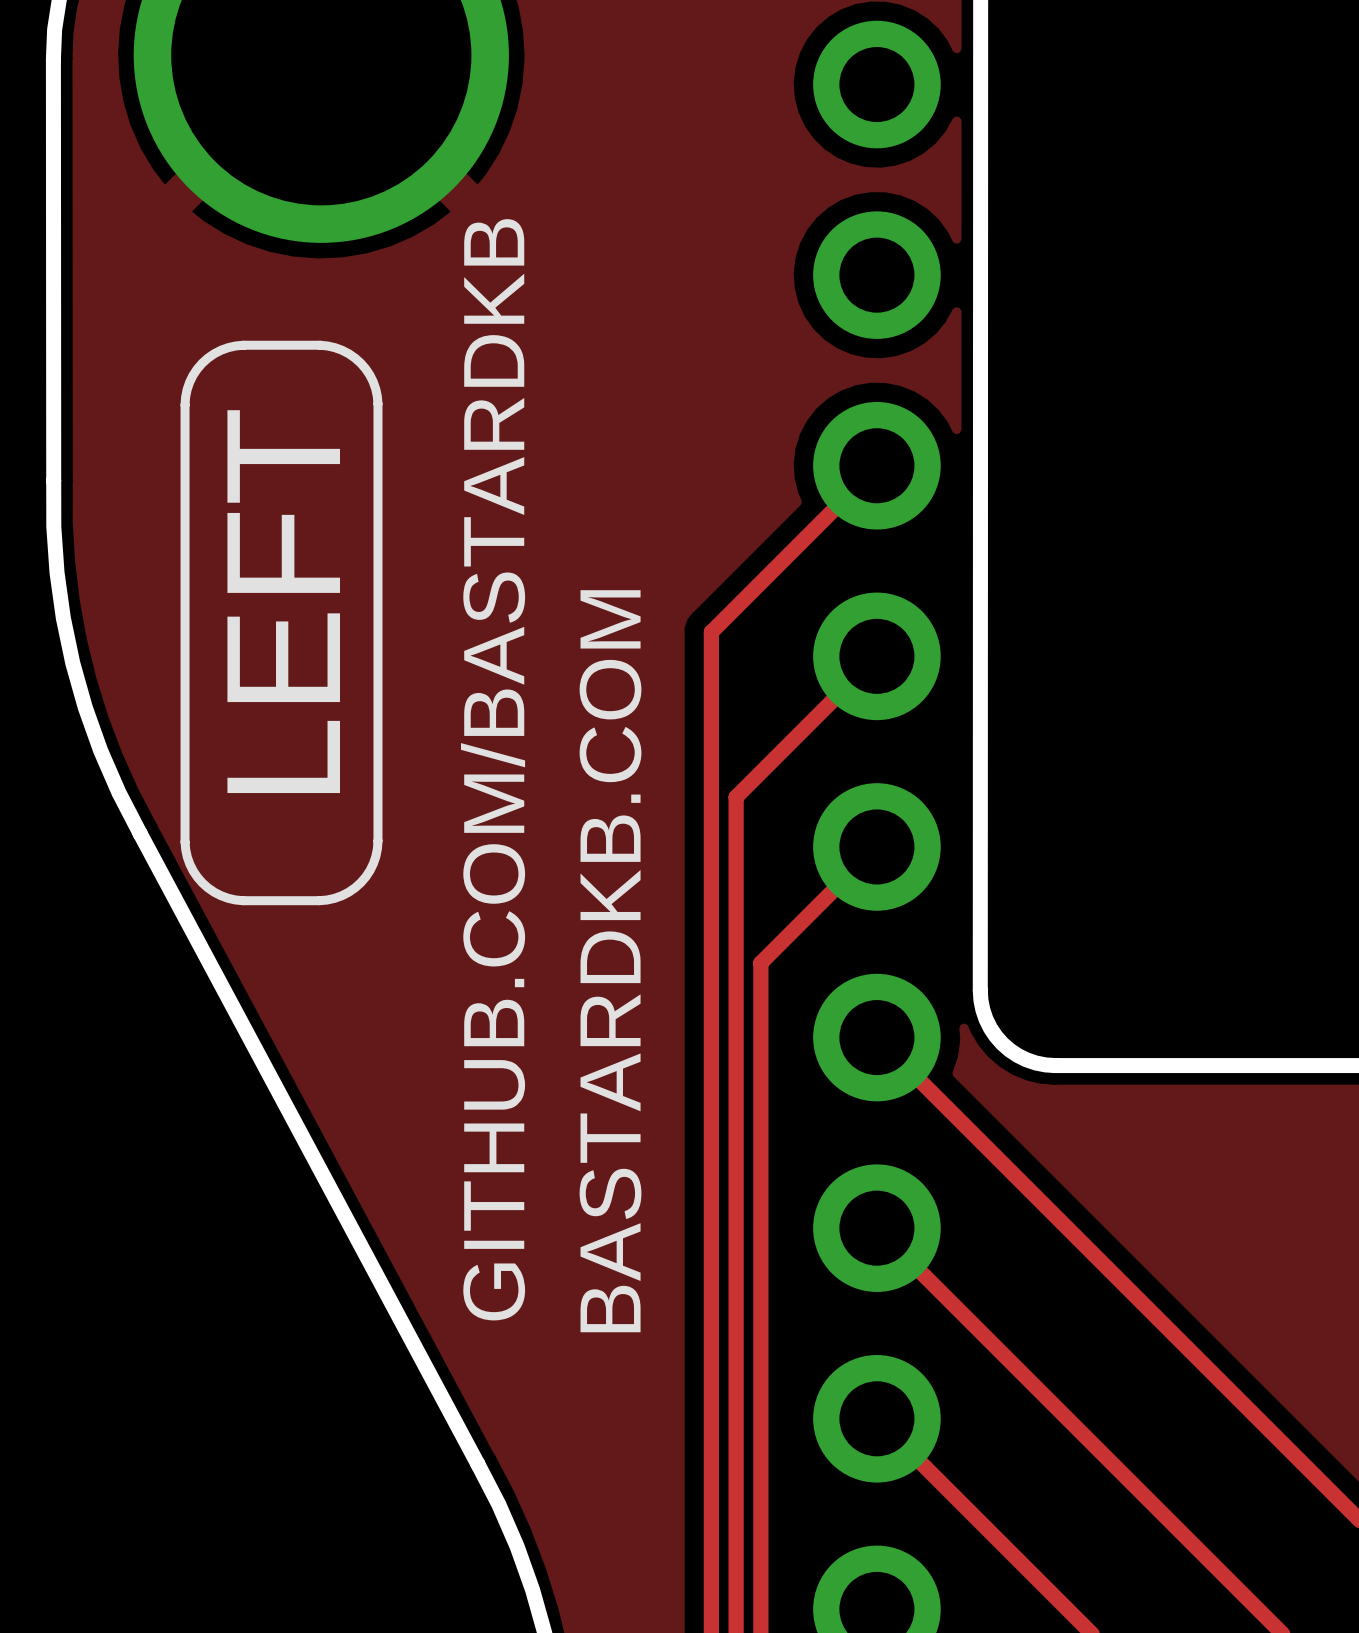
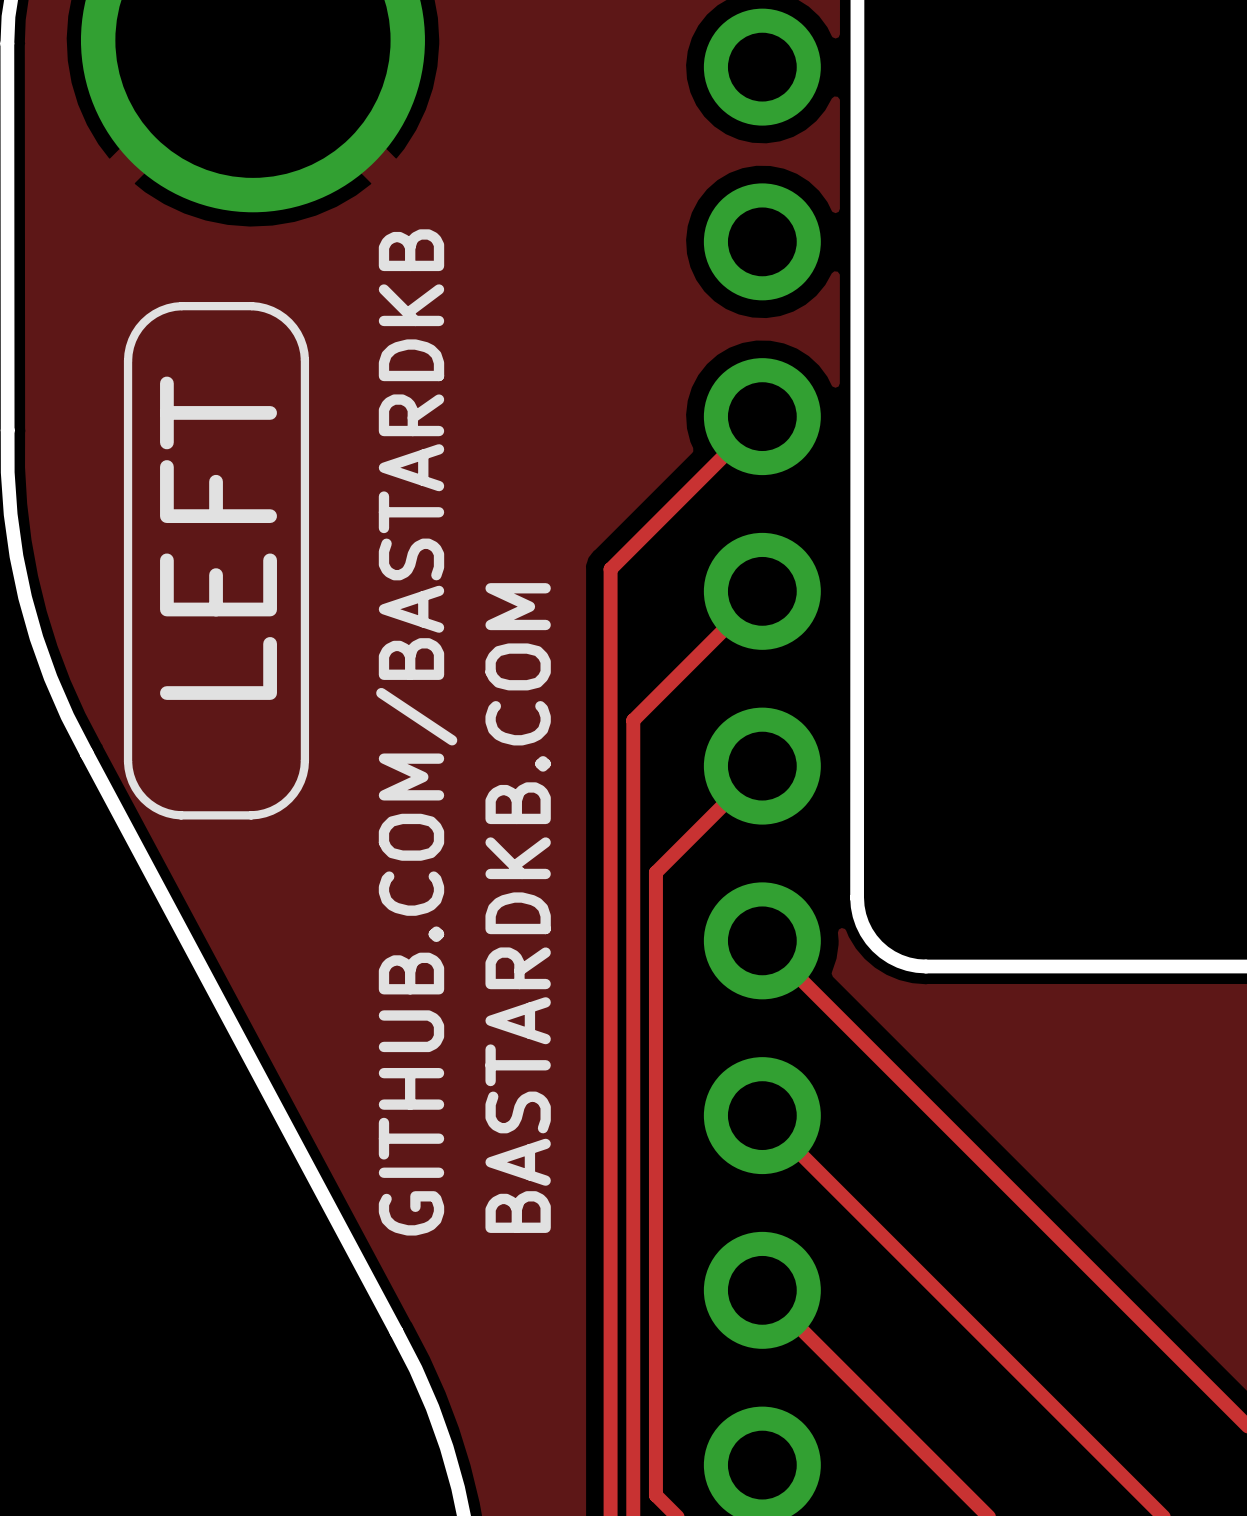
text position: GITHUB.COM/BASTARDKB (493, 769) -> GITHUB.COM/BASTARDKB (416, 732)
text position: BASTARDKB.COM (610, 961) -> BASTARDKB.COM (518, 908)

